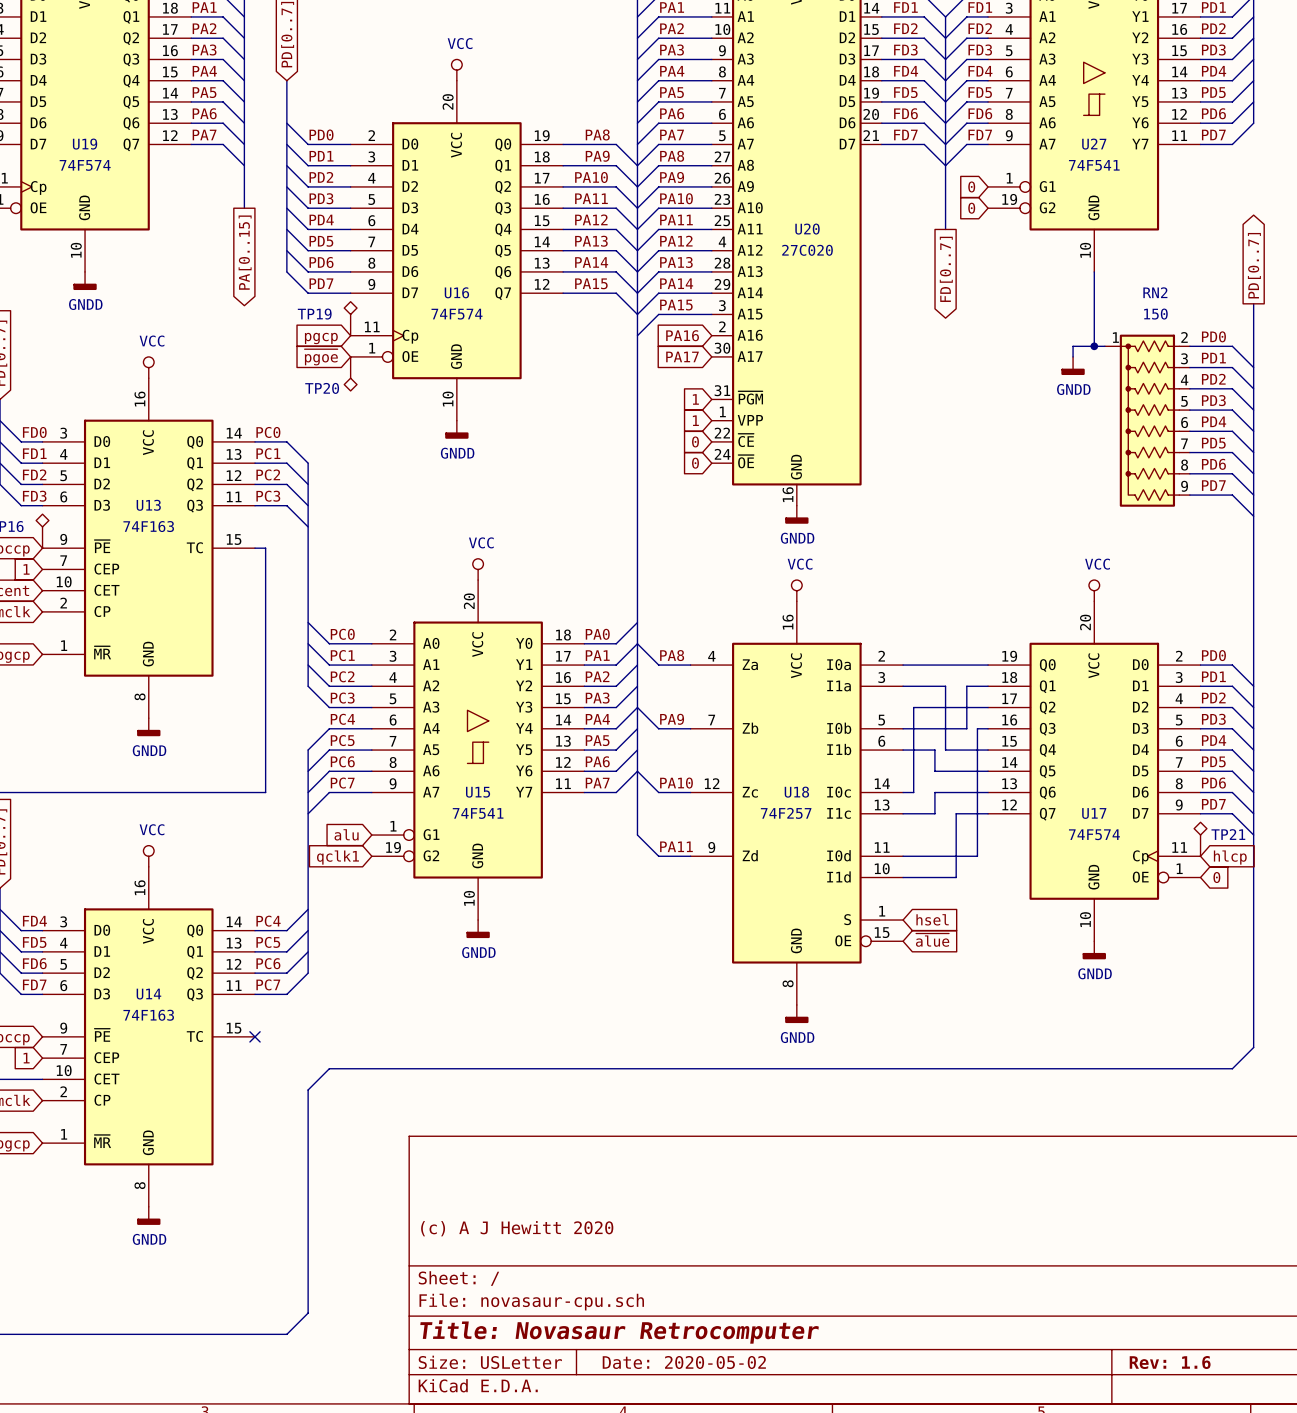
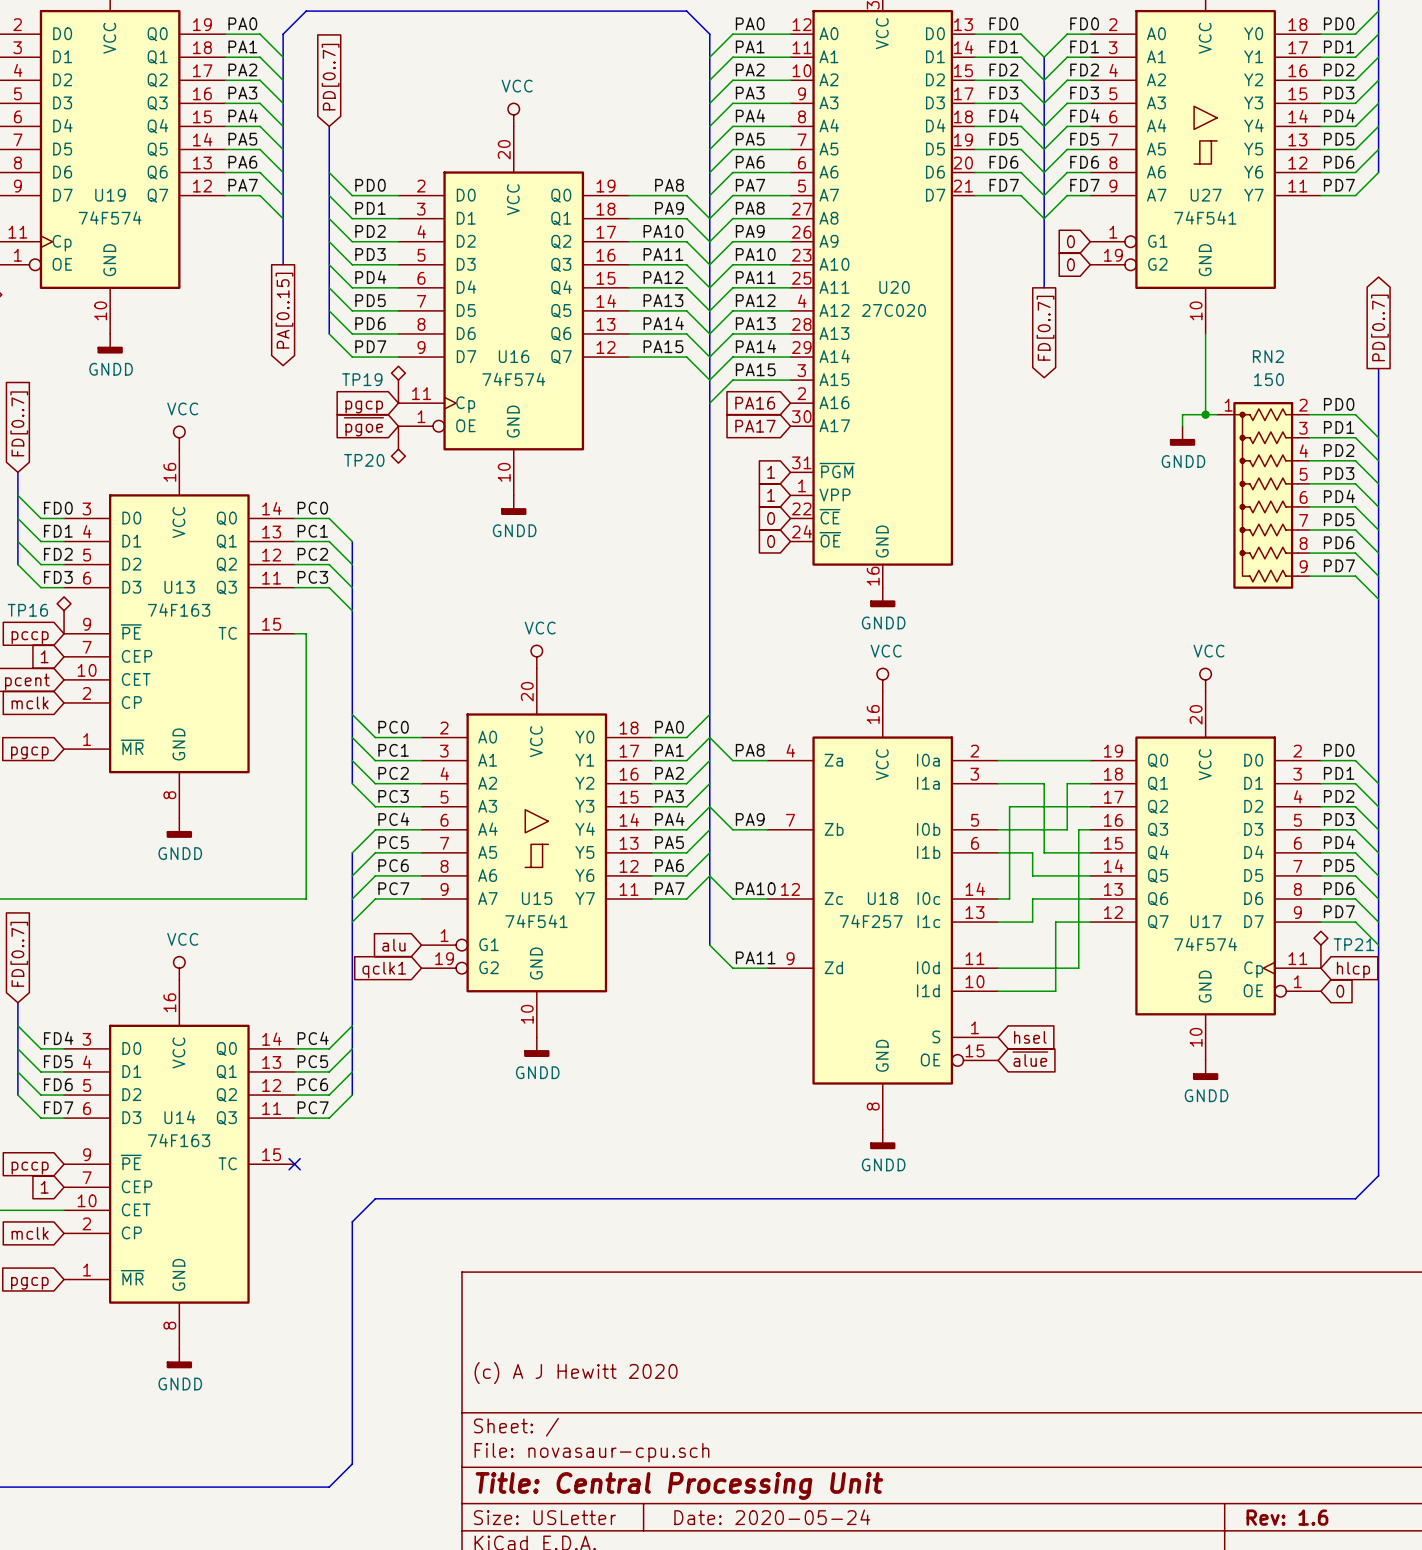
title block: Title: Novasaur Retrocomputer (619, 1331) -> Title: Central Processing Unit (679, 1485)
title block: Date: 2020-05-02 (684, 1362) -> Date: 2020-05-24 (772, 1517)

